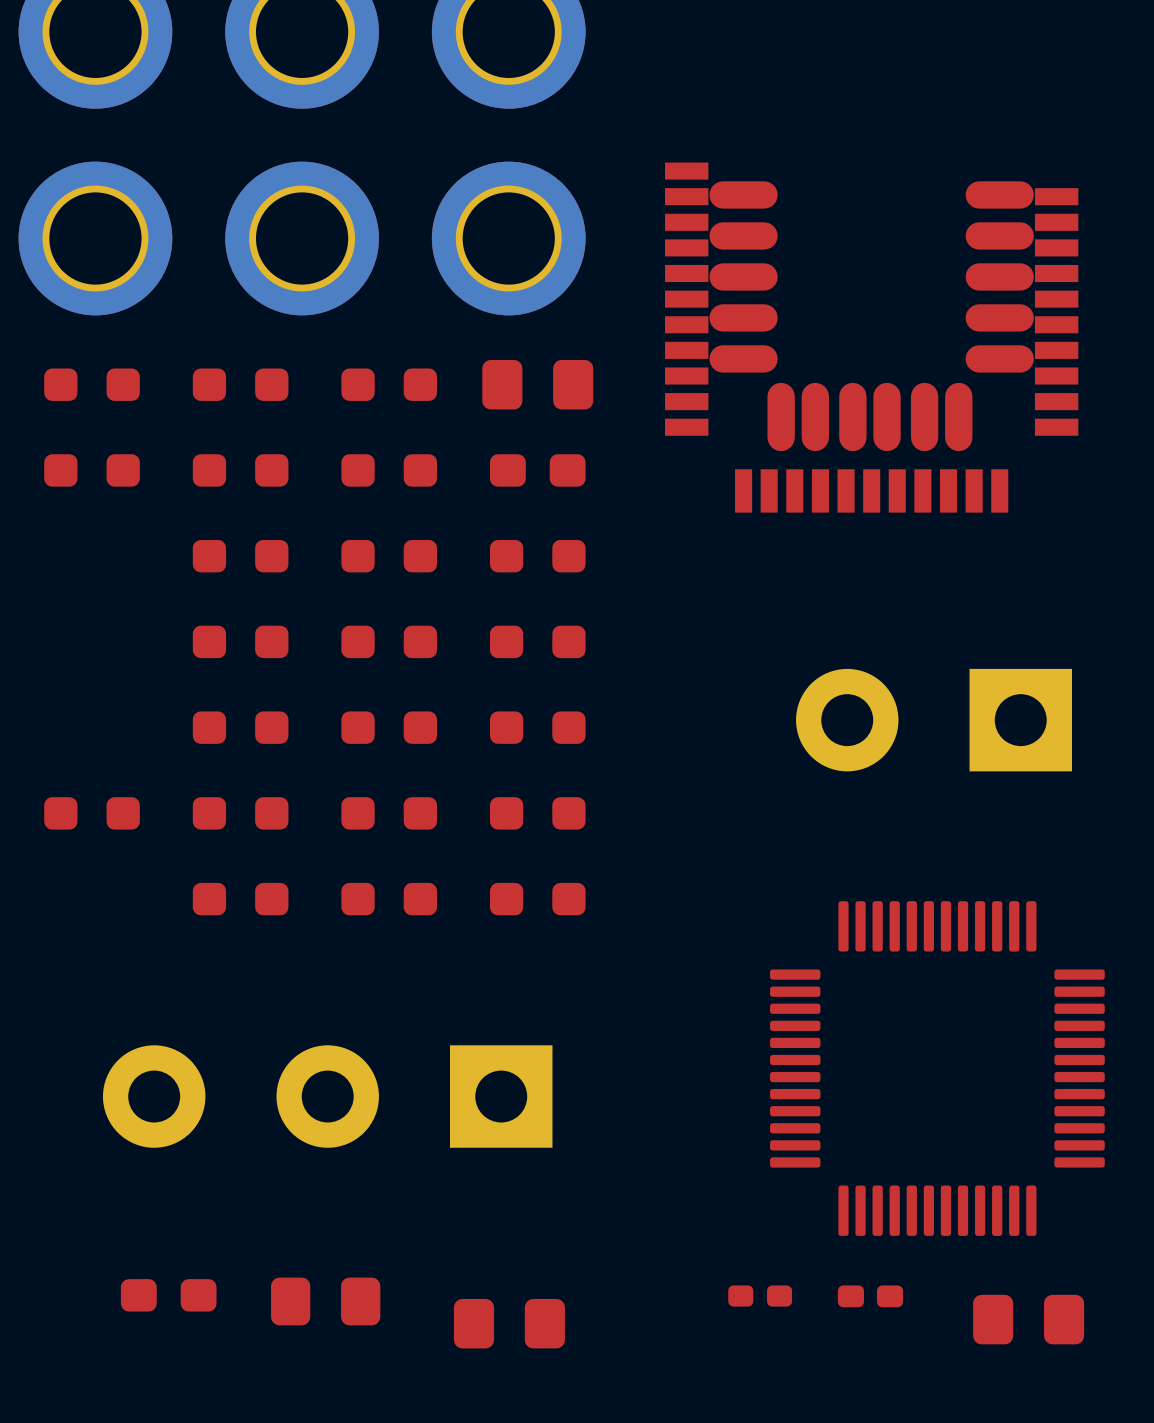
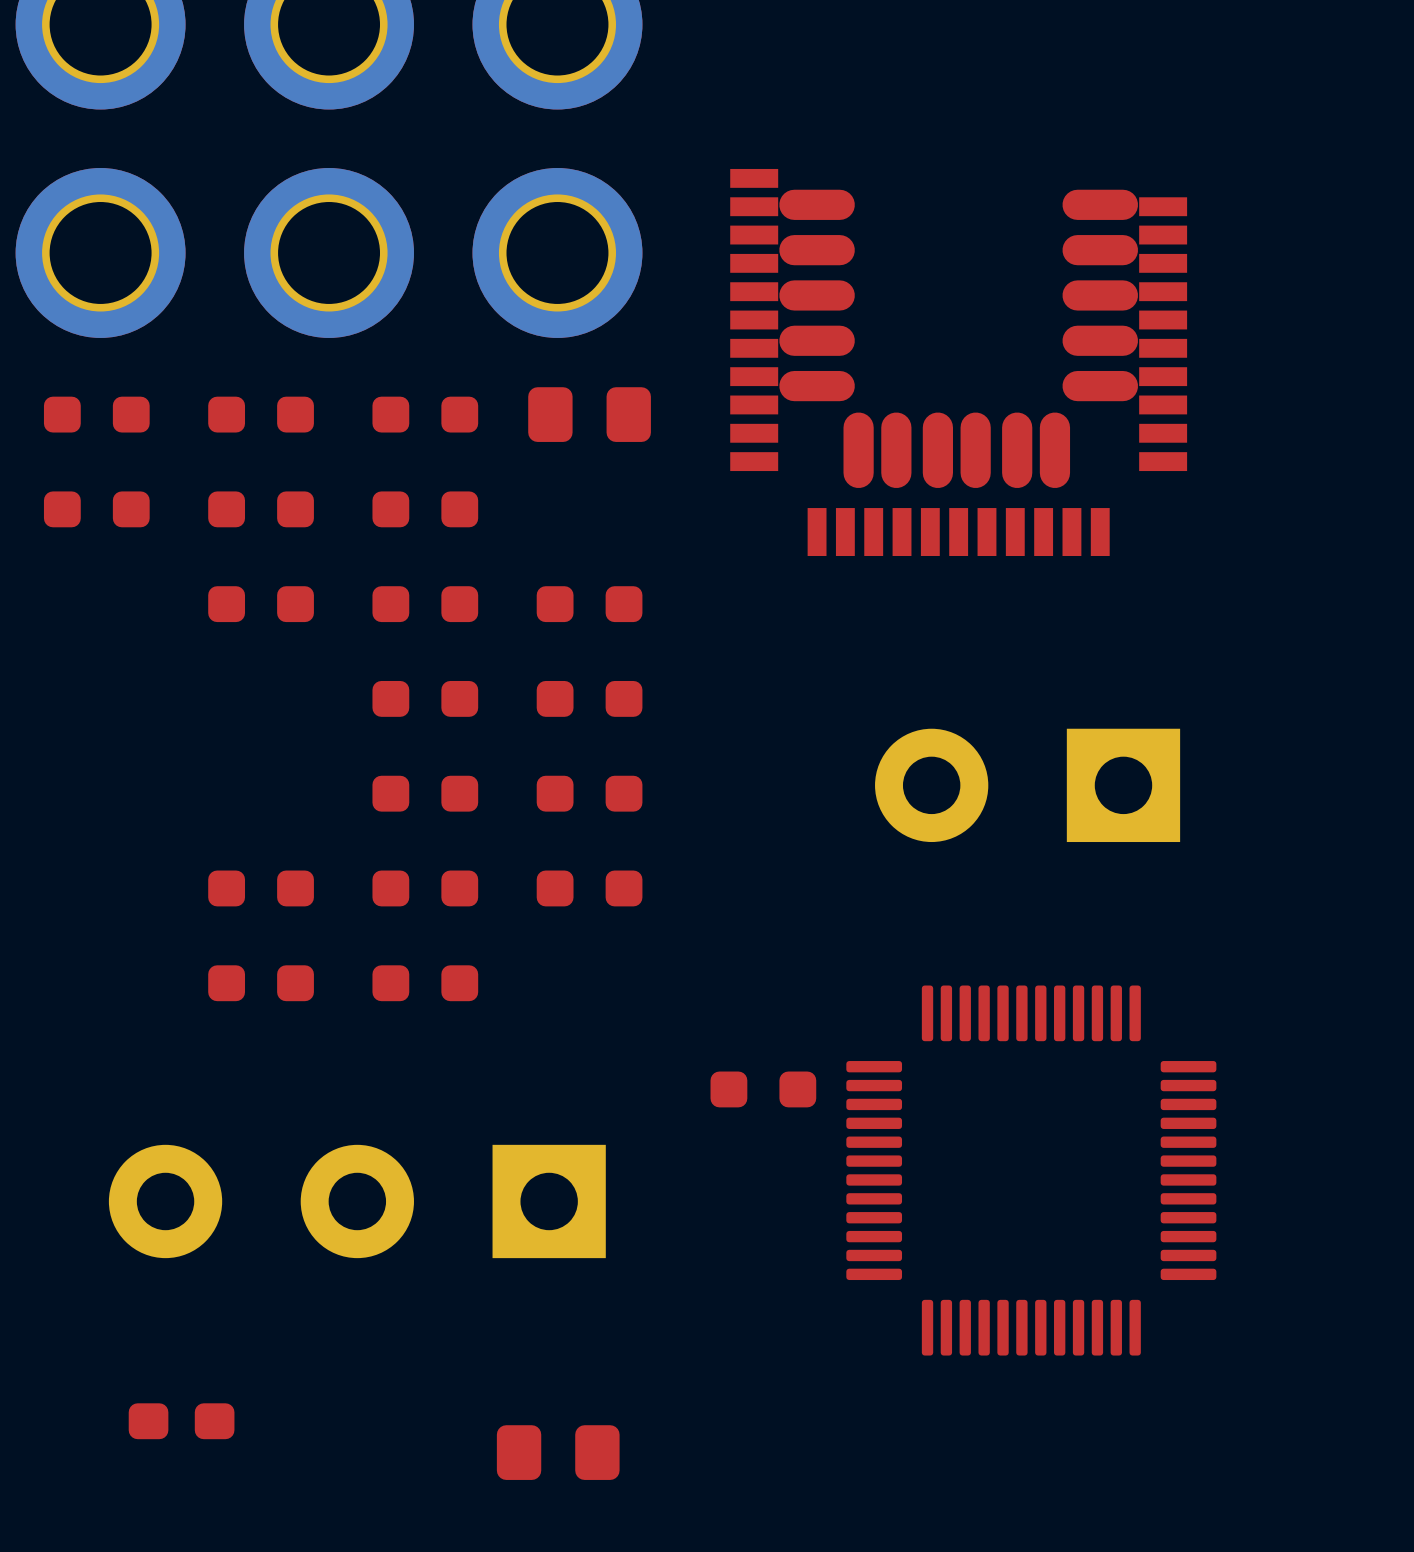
part: (537, 470) -> none
part: (240, 641) -> none
part: (240, 727) -> none
part: (92, 813) -> none
part position: (537, 899) -> (763, 1089)
part: (760, 1296) -> none
part: (870, 1296) -> none
part: (325, 1301) -> none
part: (1028, 1319) -> none

